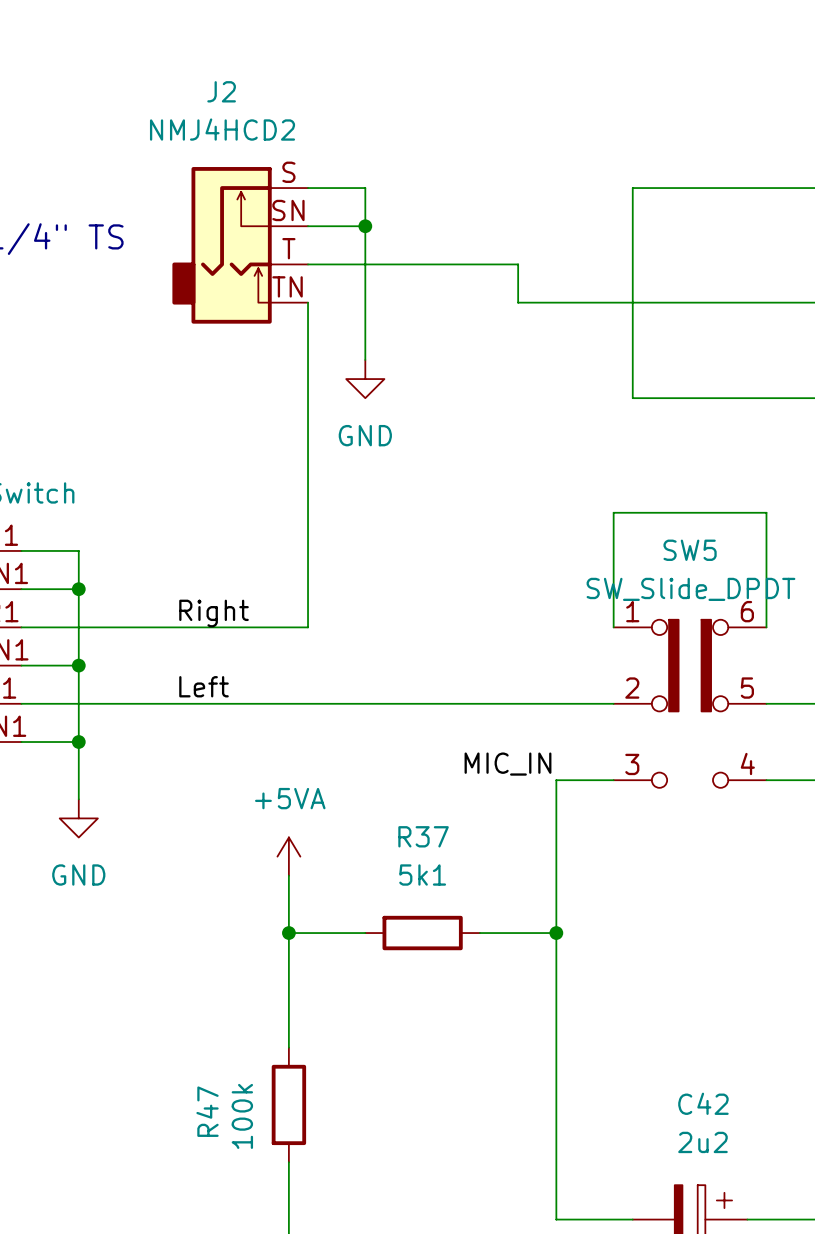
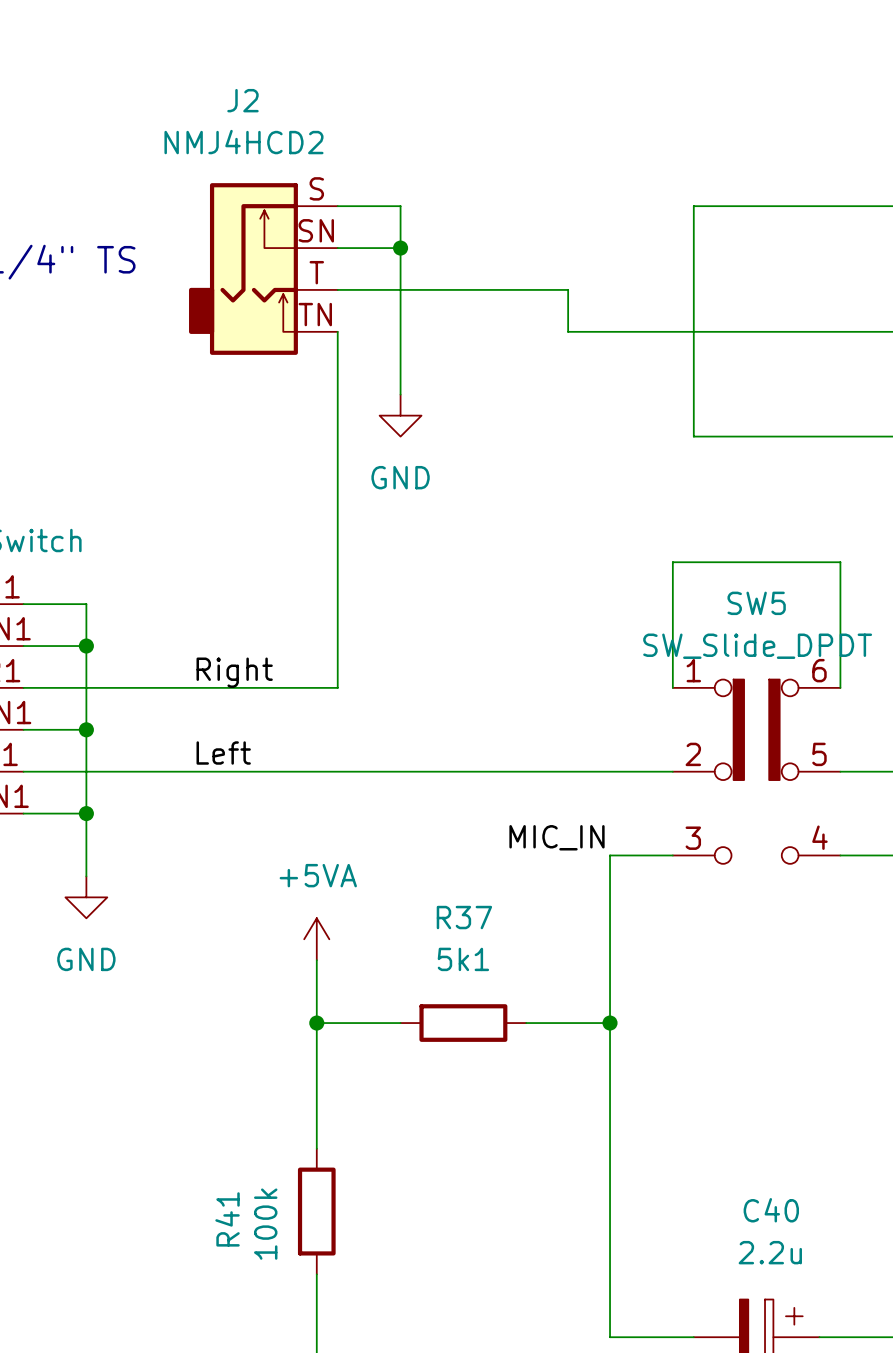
C42 name: C42 (703, 1103) -> C40 (771, 1210)
R47 name: R47 (207, 1111) -> R41 (227, 1219)
C42 value: 2u2 (702, 1142) -> 2.2u (770, 1252)

